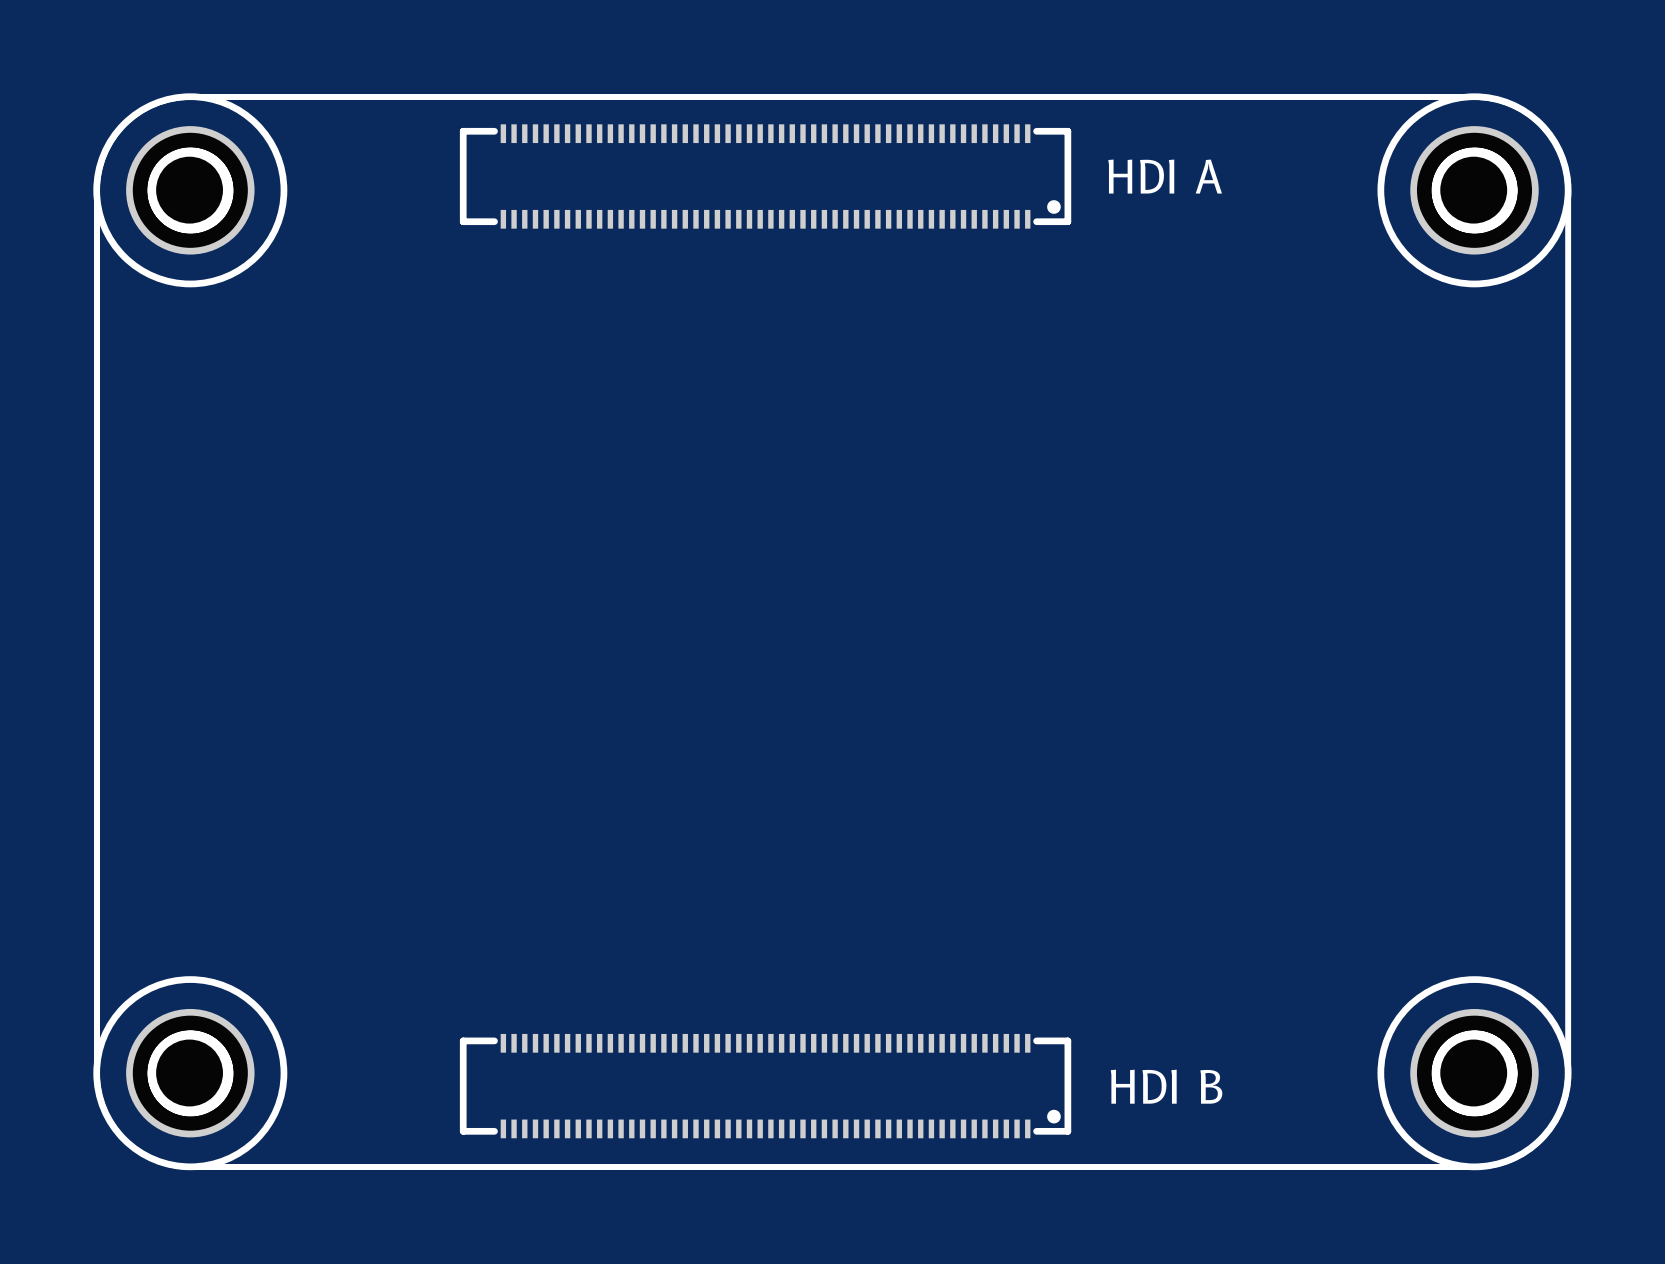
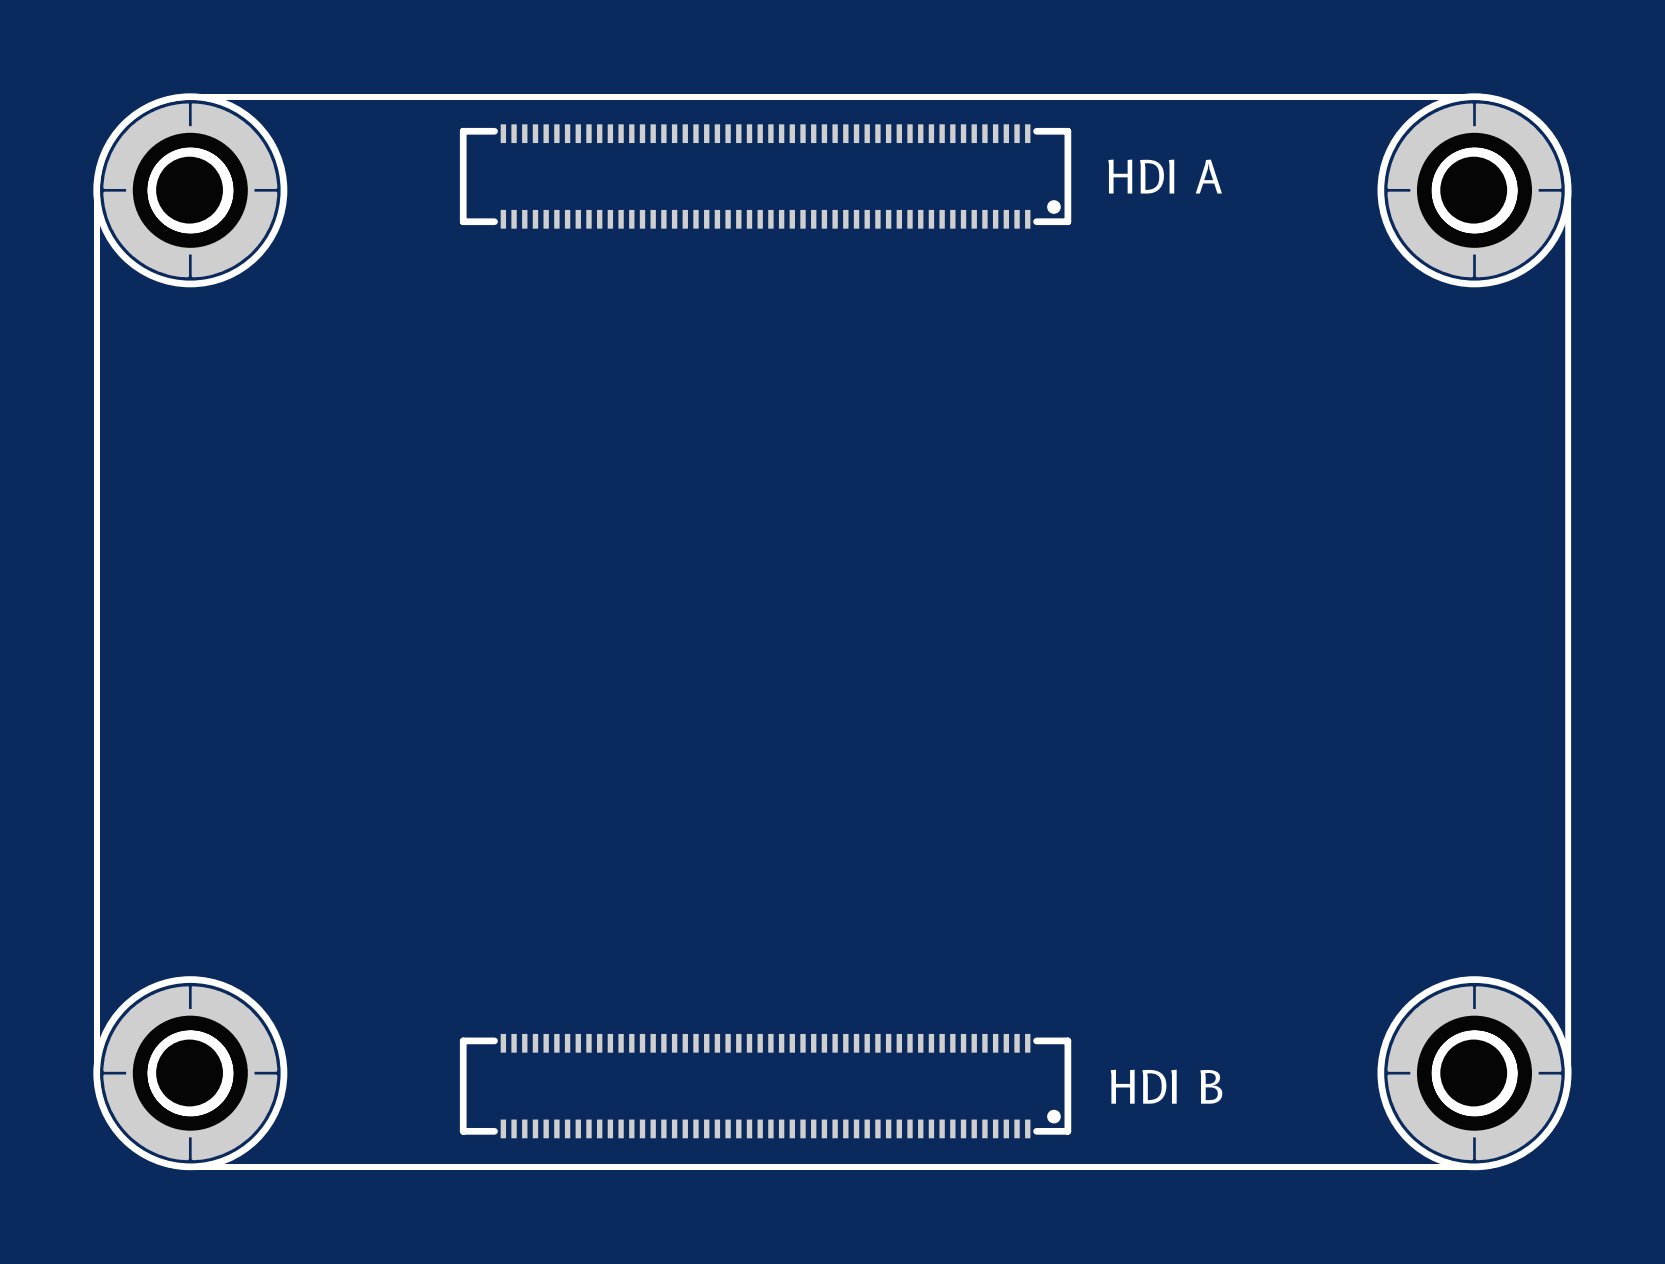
part footprint: [93, 93, 288, 288] -> [93, 93, 288, 288]
part footprint: [1377, 93, 1572, 288] -> [1377, 93, 1572, 288]
part footprint: [93, 976, 288, 1171] -> [93, 976, 288, 1171]
part footprint: [1377, 976, 1572, 1171] -> [1377, 976, 1572, 1171]

